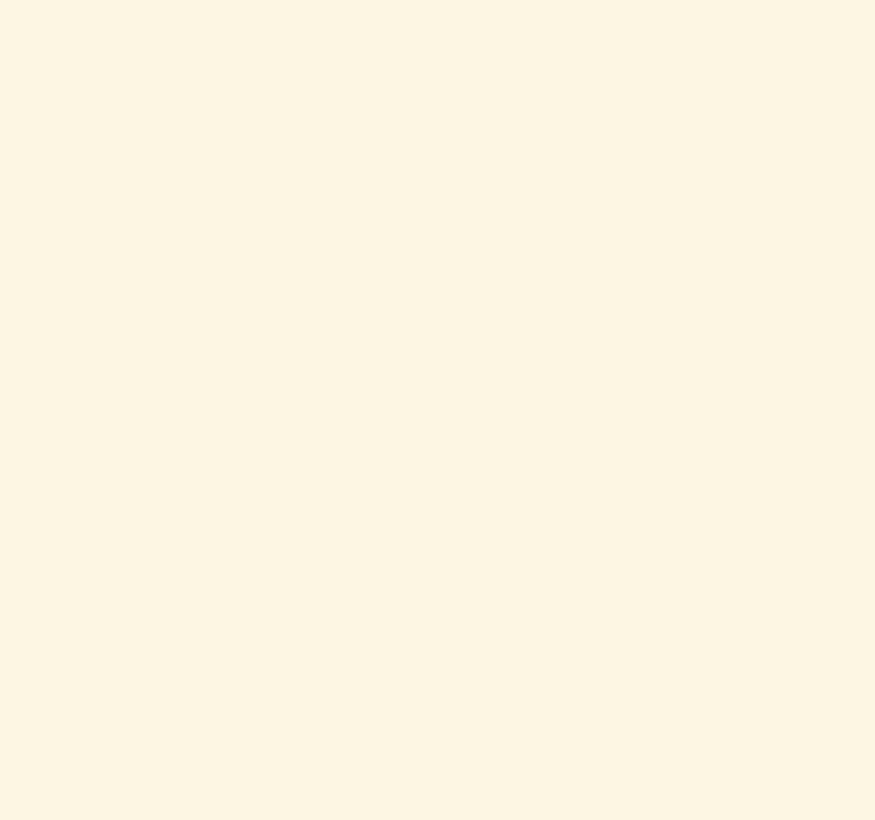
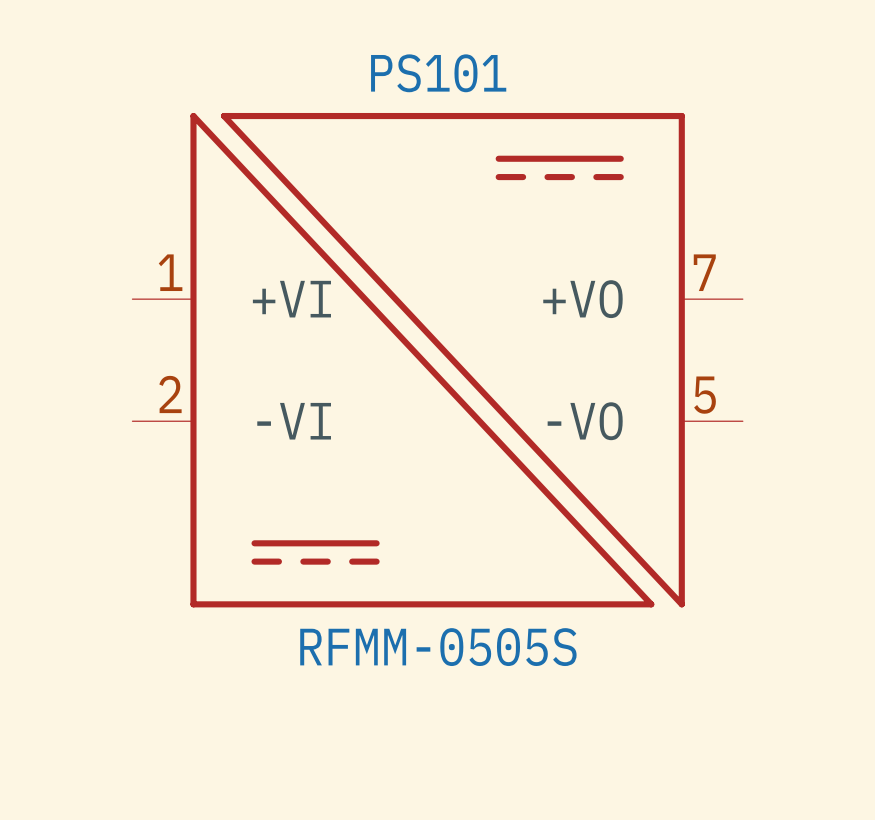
PS101: none -> RFMM-0505S (437, 360)

